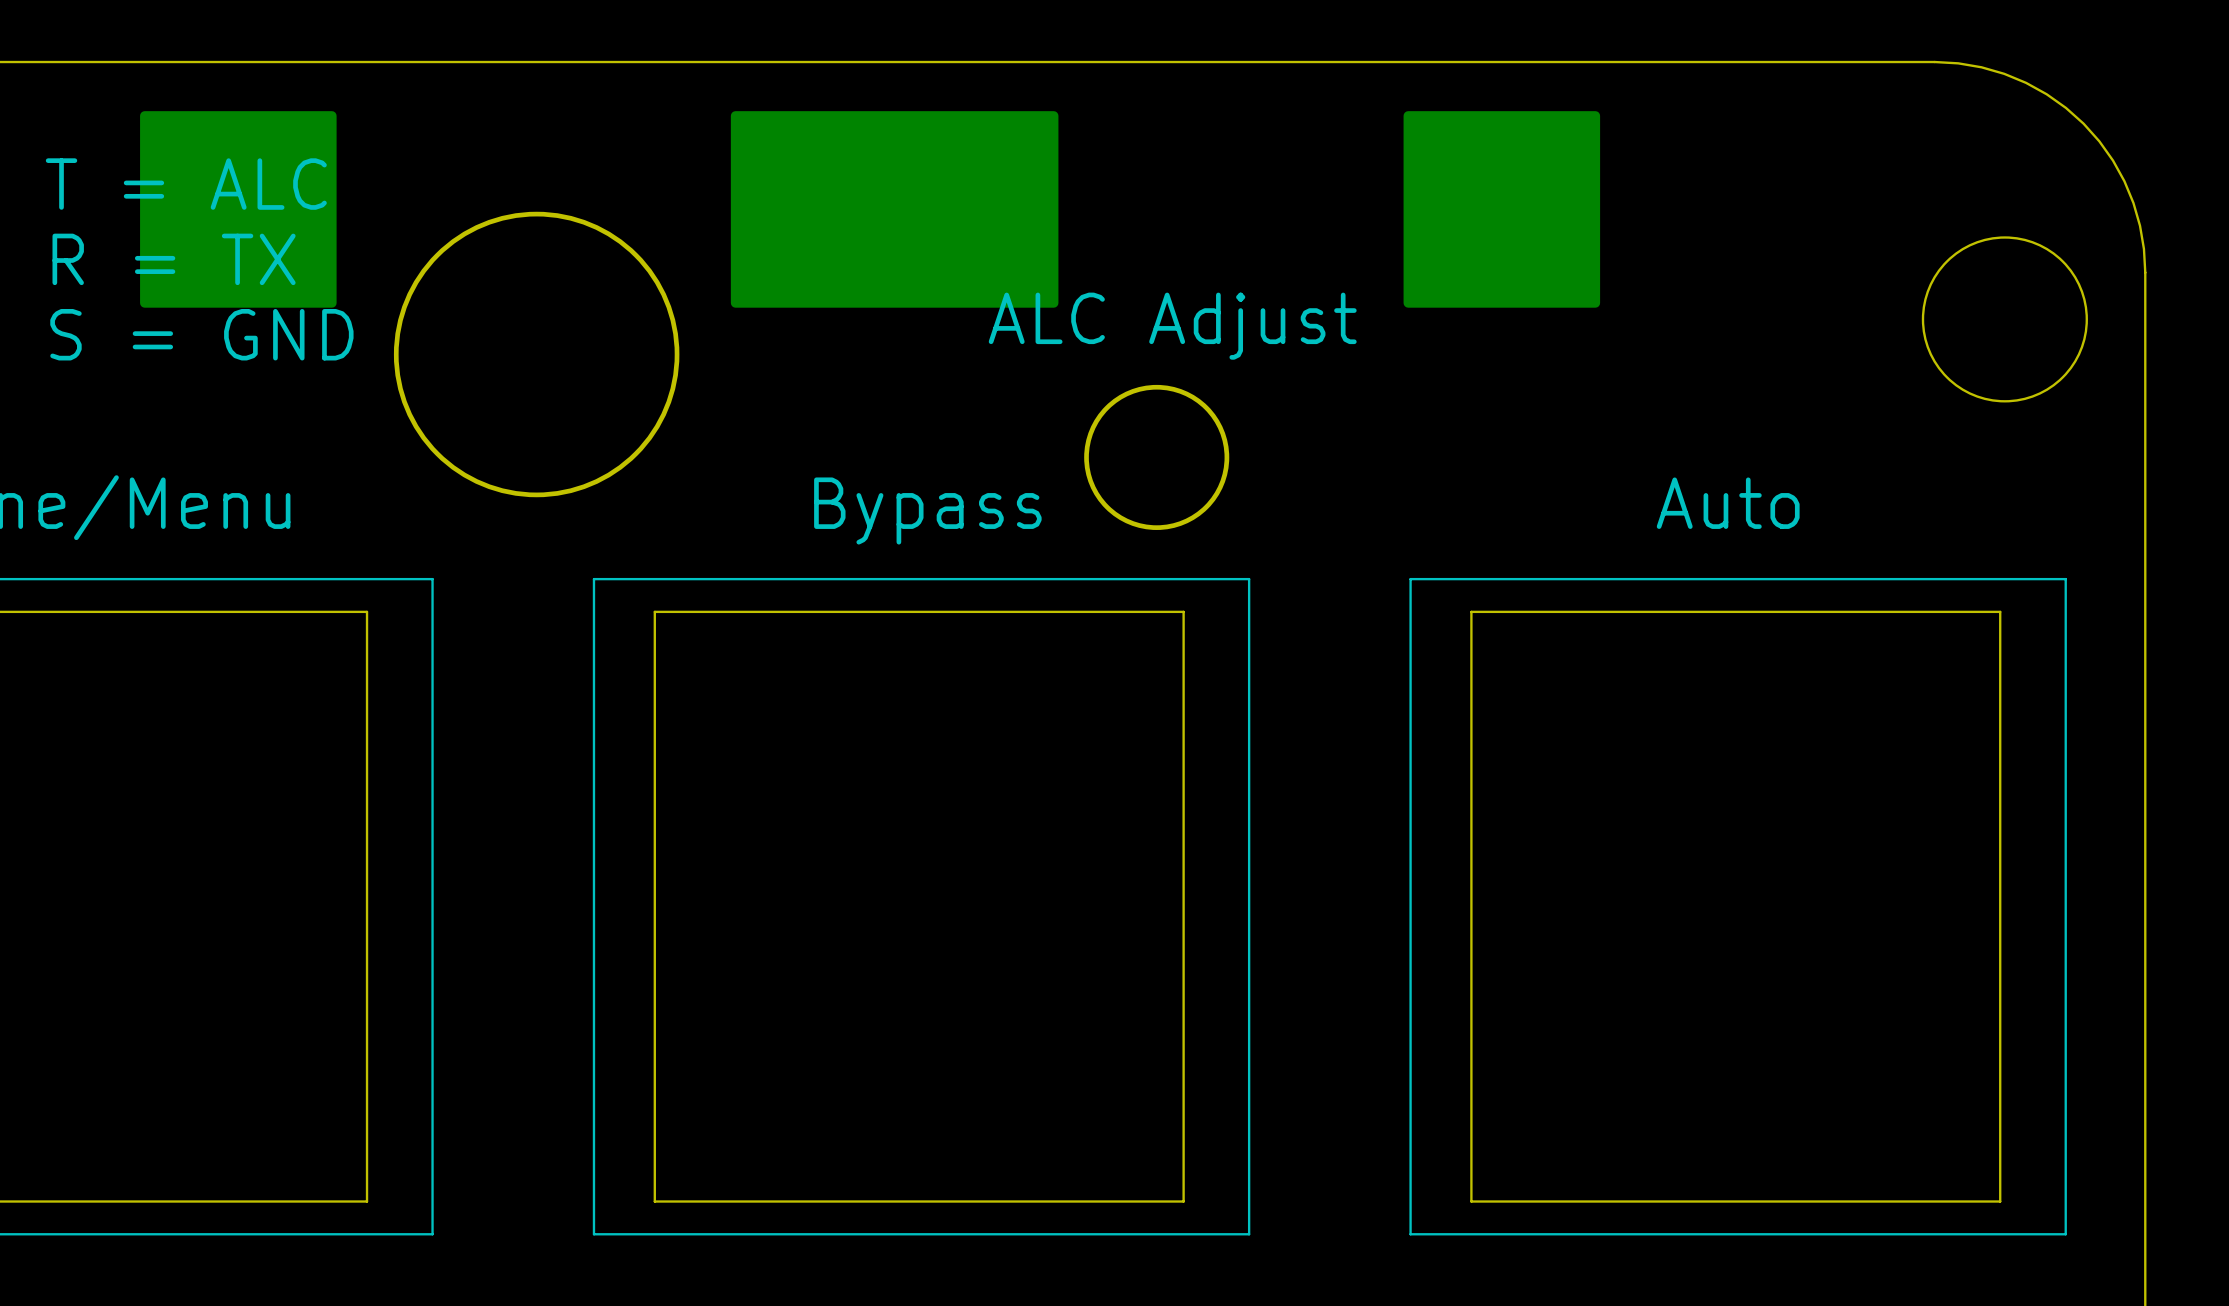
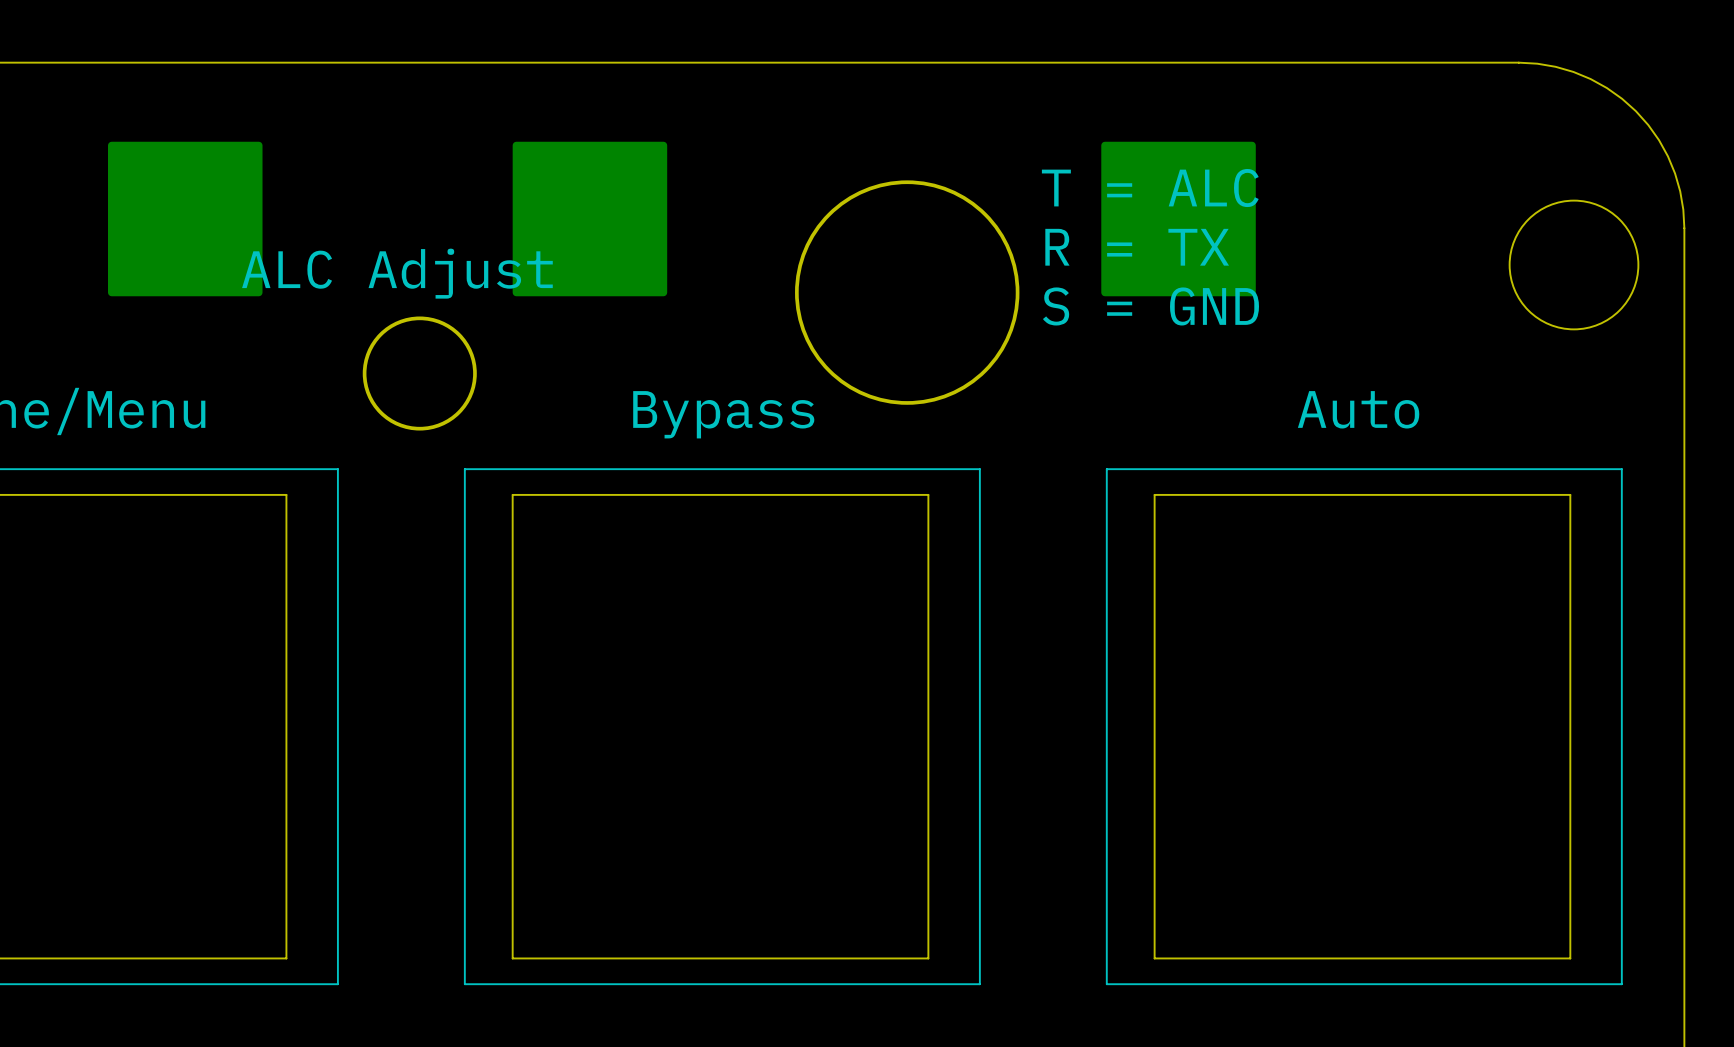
drawing: [730, 111, 1059, 308] -> none
drawing: none -> [512, 141, 668, 297]
text: T = ALC (186, 184) -> none
drawing position: (238, 209) -> (185, 219)
drawing position: (1501, 209) -> (1178, 219)
text: none -> T = ALC (1150, 188)
text: R = TX (174, 259) -> none
text: none -> R = TX (1137, 247)
text position: ALC Adjust (1172, 326) -> ALC Adjust (397, 273)
text: S = GND (201, 334) -> none
round board edge position: (536, 354) -> (907, 292)
text: none -> S = GND (1150, 306)
round board edge position: (1156, 457) -> (419, 373)

